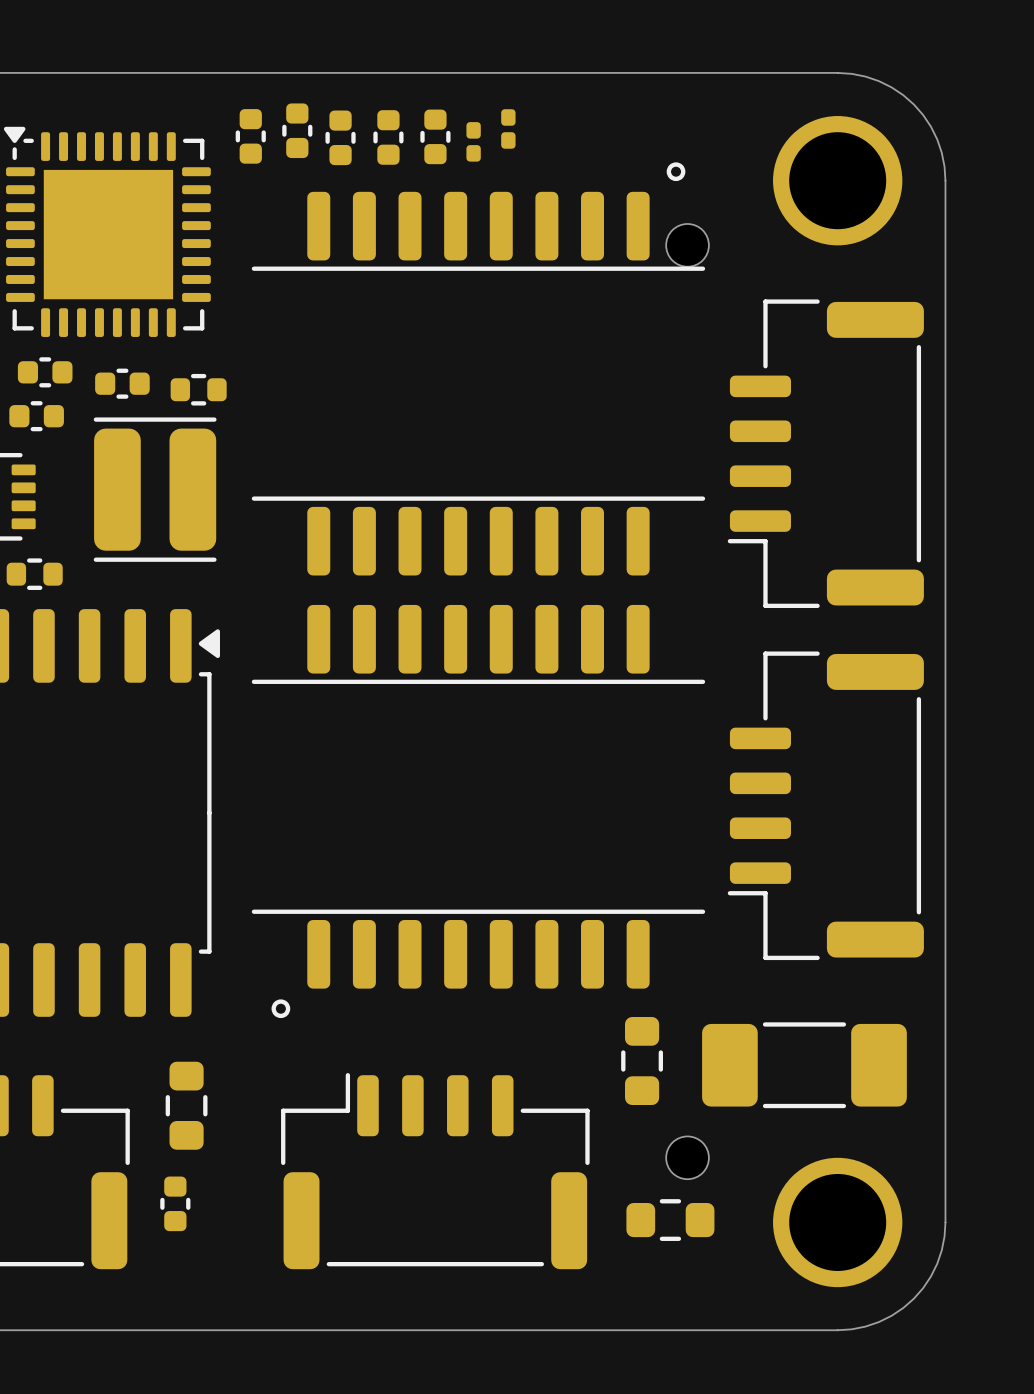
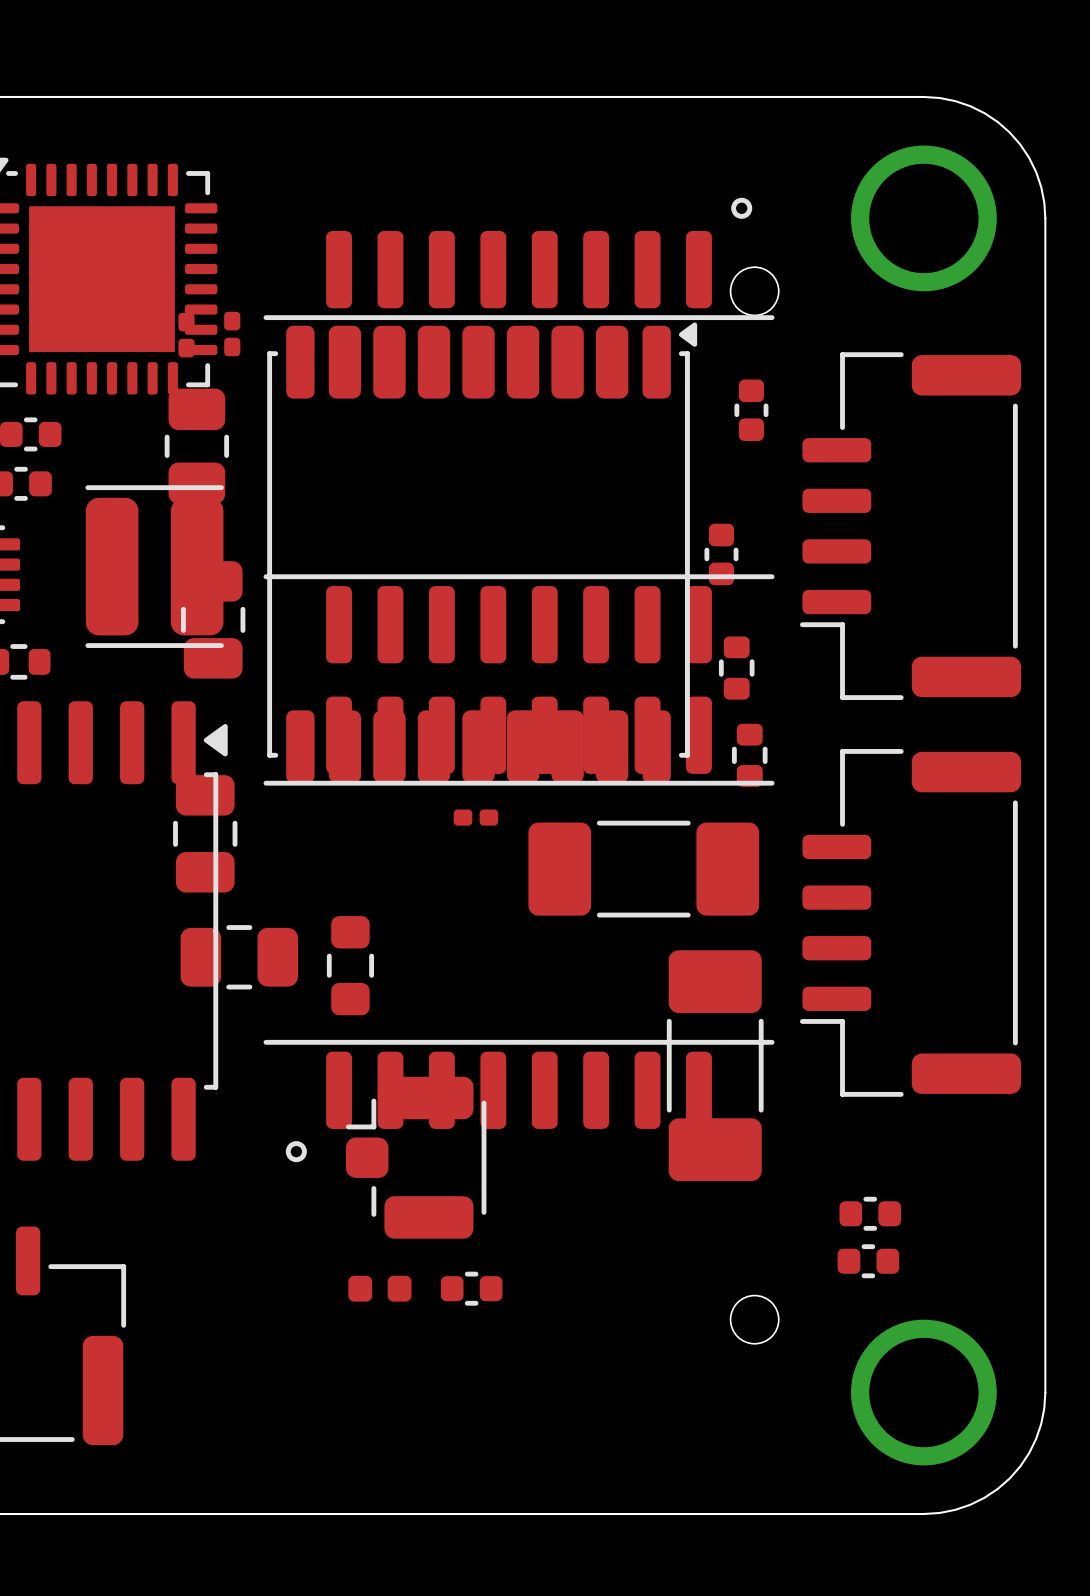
part: (508, 128) -> none
part: (297, 130) -> none
part: (250, 136) -> none
part: (435, 136) -> none
part: (340, 137) -> none
part: (388, 137) -> none
part: (473, 141) -> none
part: none -> (232, 334)
part: none -> (186, 335)
part: none -> (751, 410)
part footprint: [170, 373, 227, 406] -> [164, 388, 230, 505]
part: (122, 383) -> none
part: none -> (482, 552)
part: none -> (721, 554)
part: none -> (213, 619)
part: none -> (736, 668)
part: none -> (749, 755)
part: none -> (475, 817)
part: none -> (205, 833)
part: none -> (643, 869)
part: none -> (239, 957)
part: none -> (350, 965)
part: none -> (715, 1065)
part: none -> (416, 1157)
part footprint: [702, 1022, 907, 1109] -> [839, 1196, 902, 1231]
part: (642, 1061) -> none
part: (186, 1105) -> none
part: none -> (868, 1261)
part: none -> (379, 1288)
part: none -> (471, 1288)
part: (435, 1171) -> none
part: (175, 1203) -> none
part: (670, 1220) -> none

